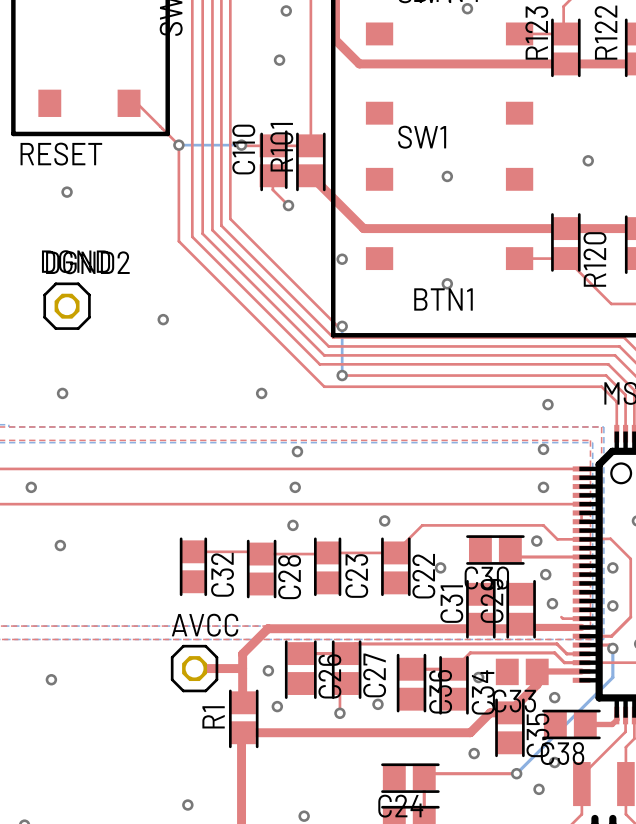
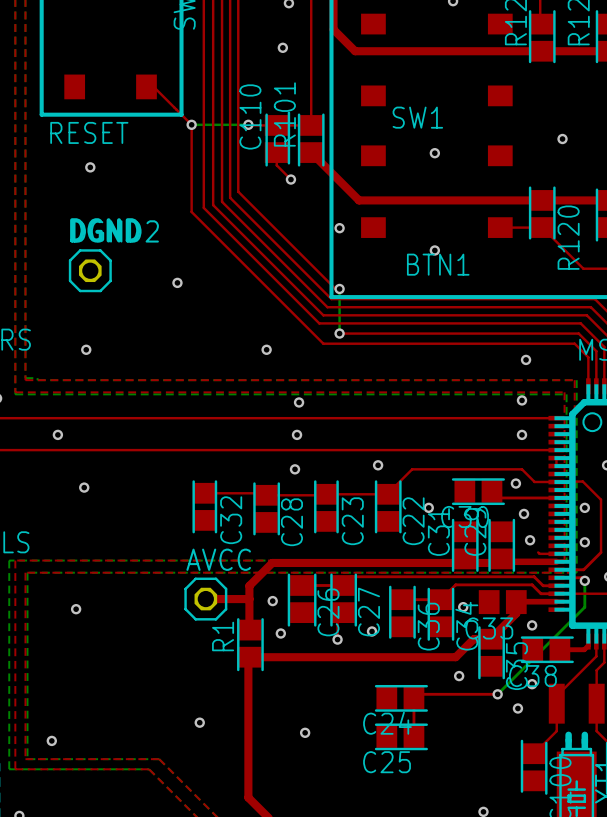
top track: (519, 33) (560, 33) -> none

